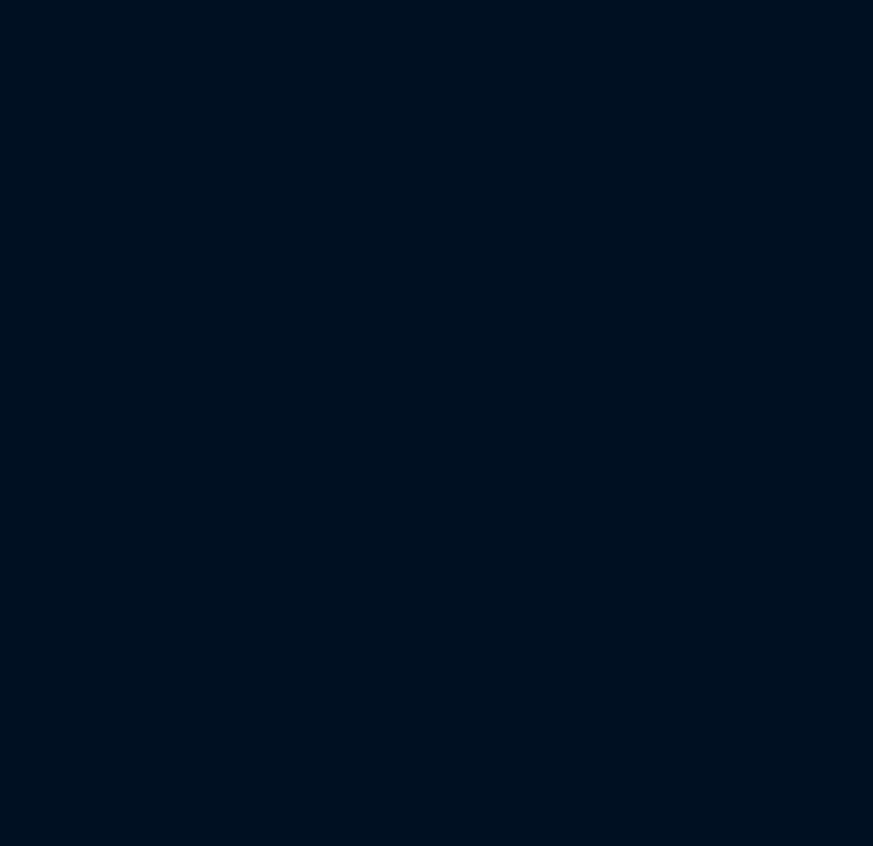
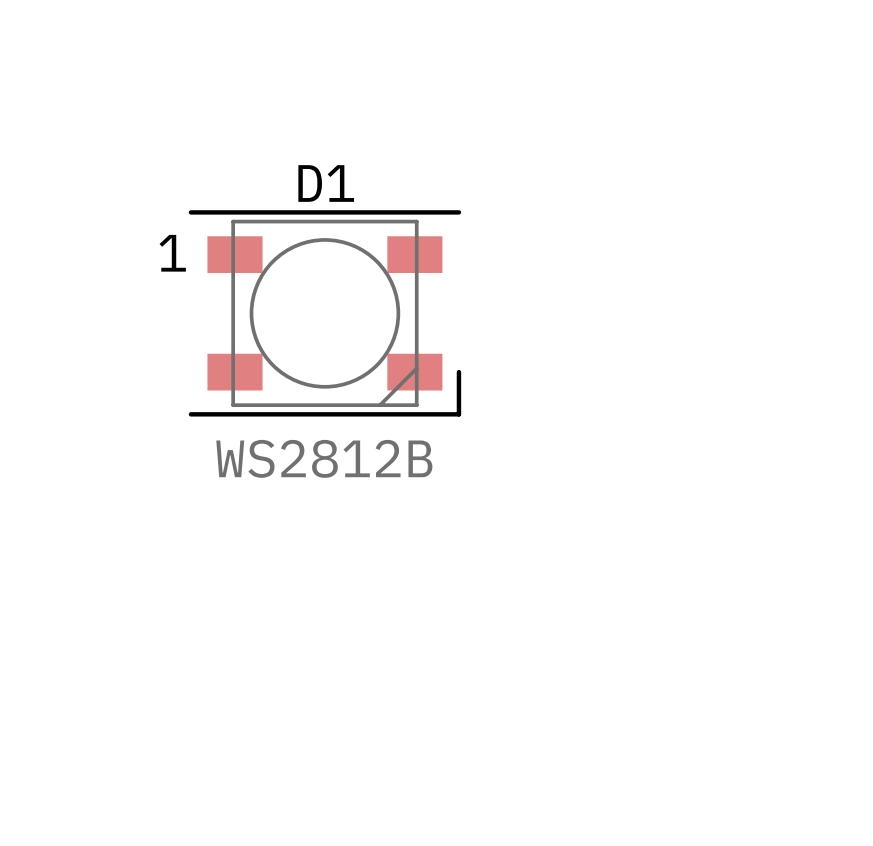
D1: none -> WS2812B (324, 313)

